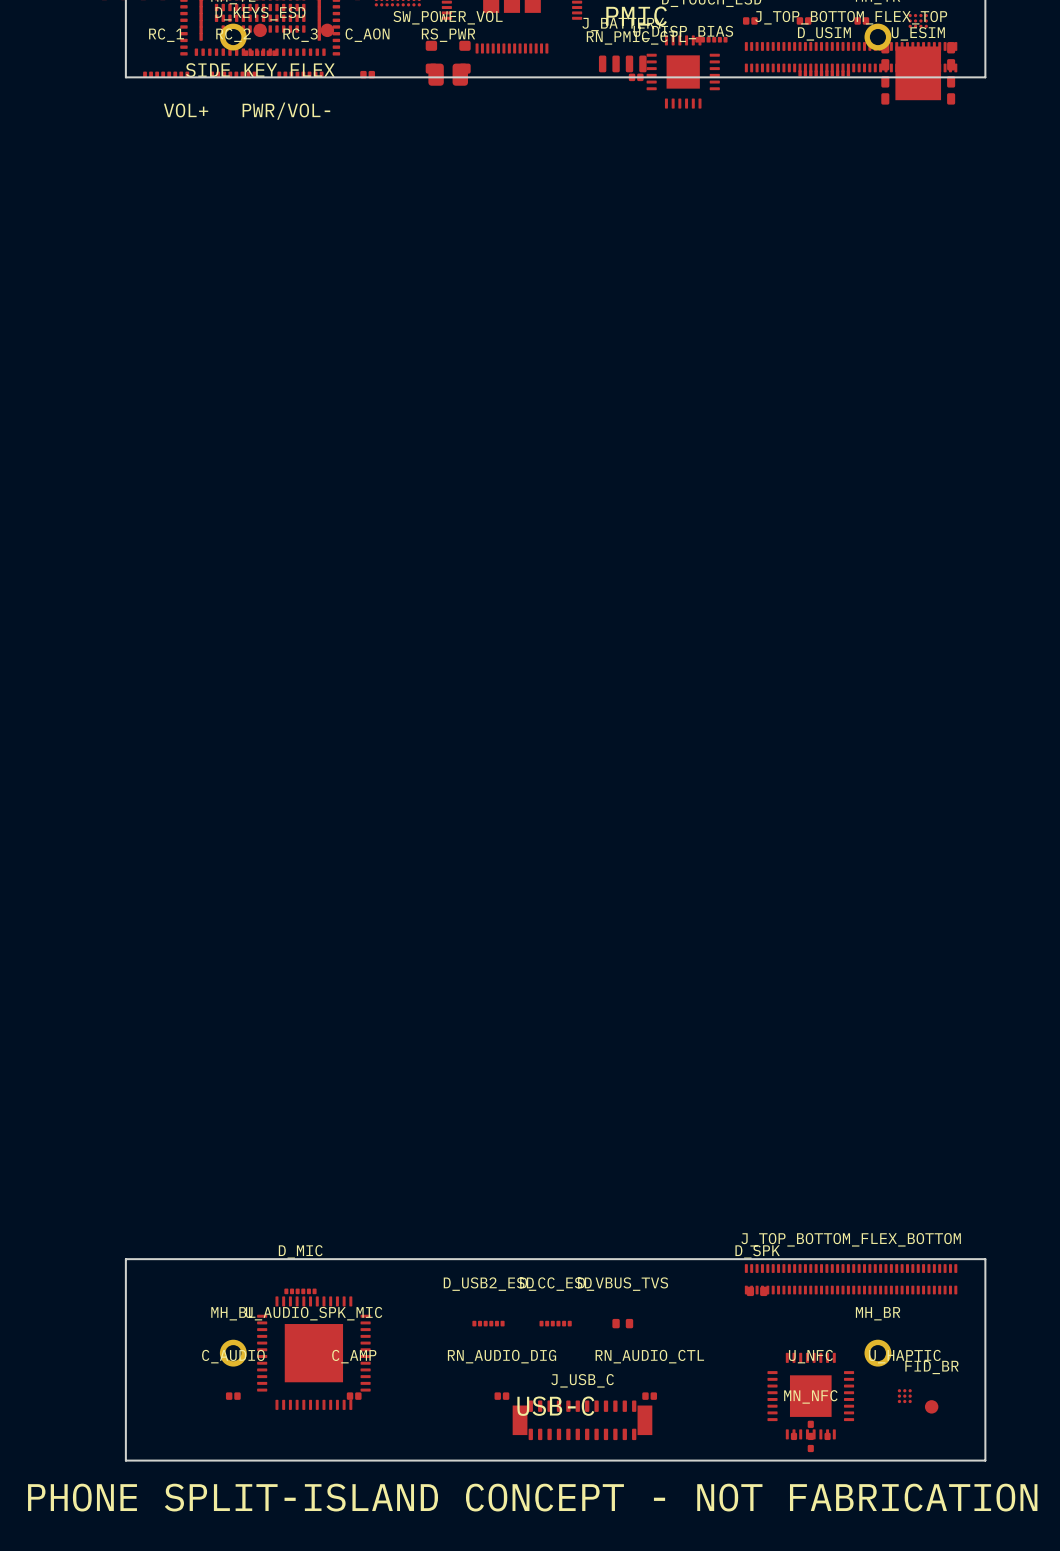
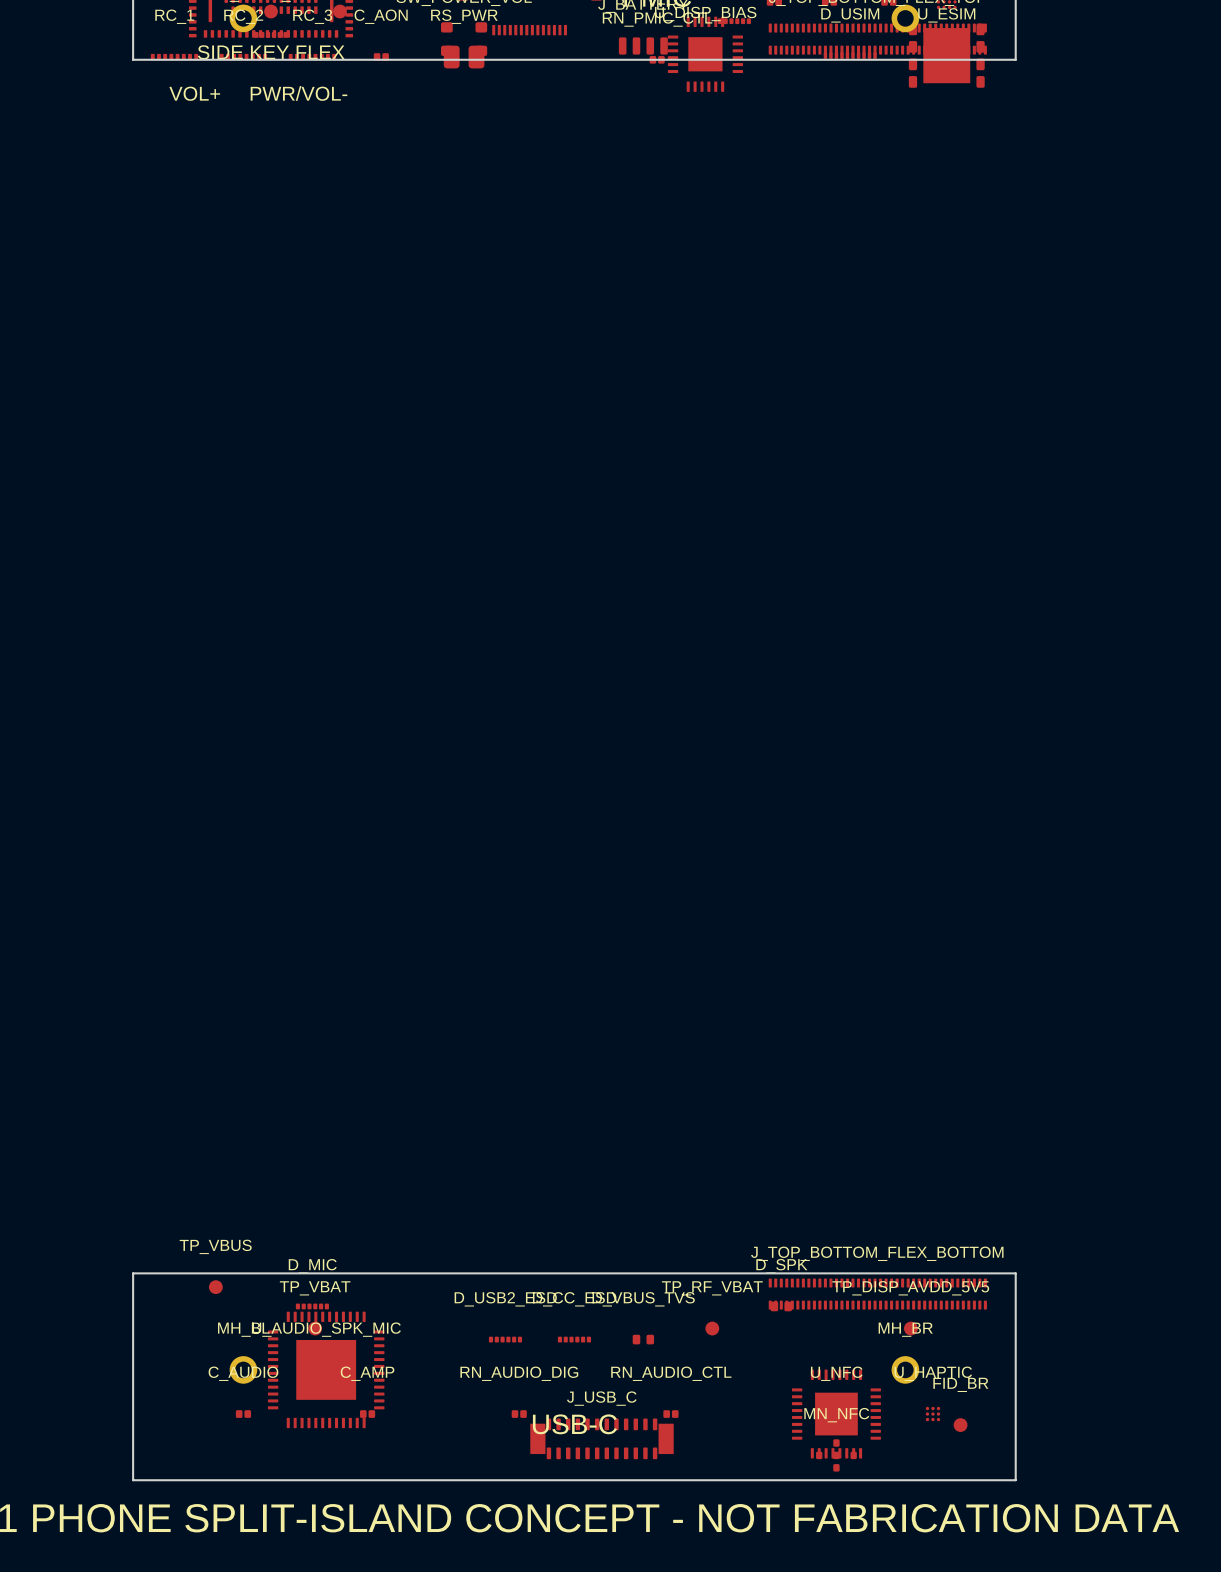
TP_VBUS: none -> (215, 1287)
TP_VBAT: none -> (315, 1328)
TP_RF_VBAT: none -> (712, 1328)
TP_DISP_AVDD_5V5: none -> (910, 1328)

